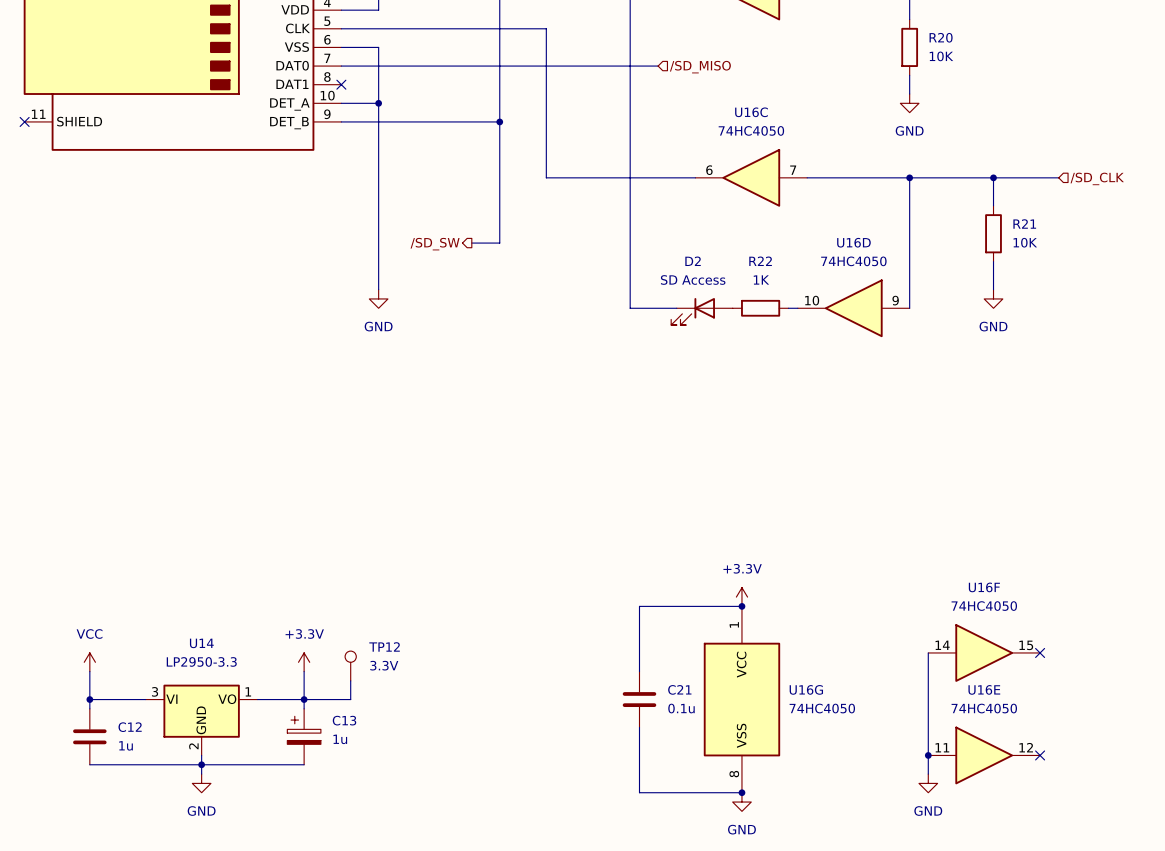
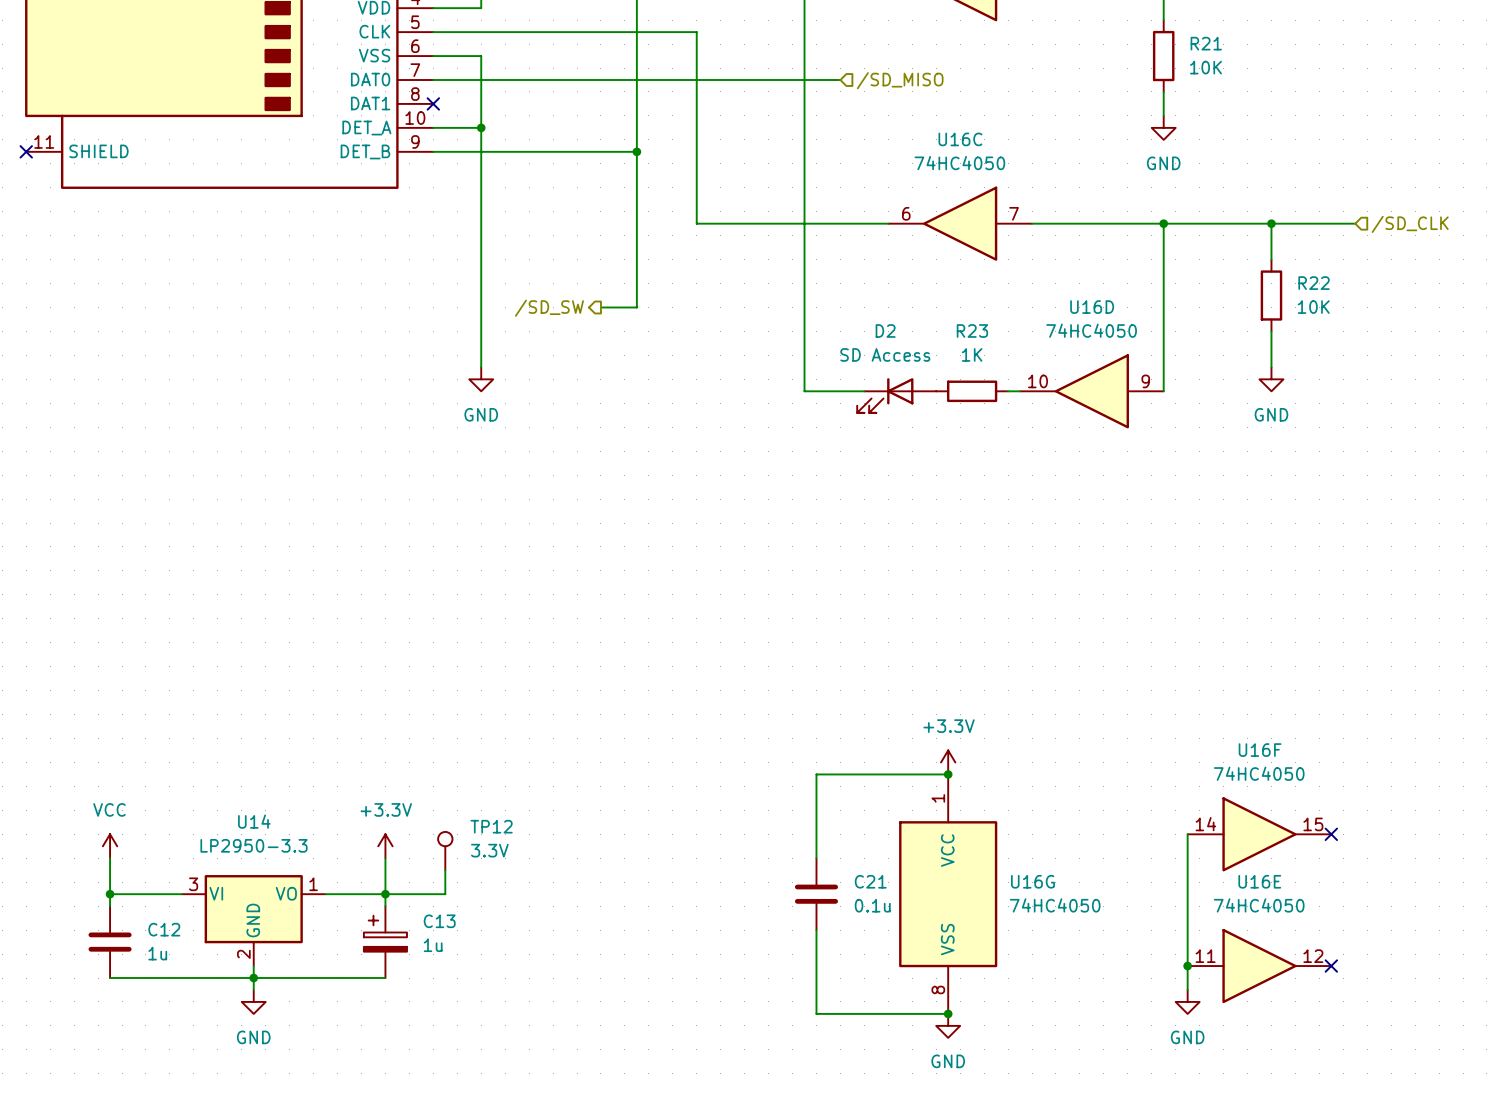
R20 name: R20 (941, 37) -> R21 (1206, 43)
R21 name: R21 (1024, 224) -> R22 (1314, 283)
R22 name: R22 (760, 261) -> R23 (972, 330)

